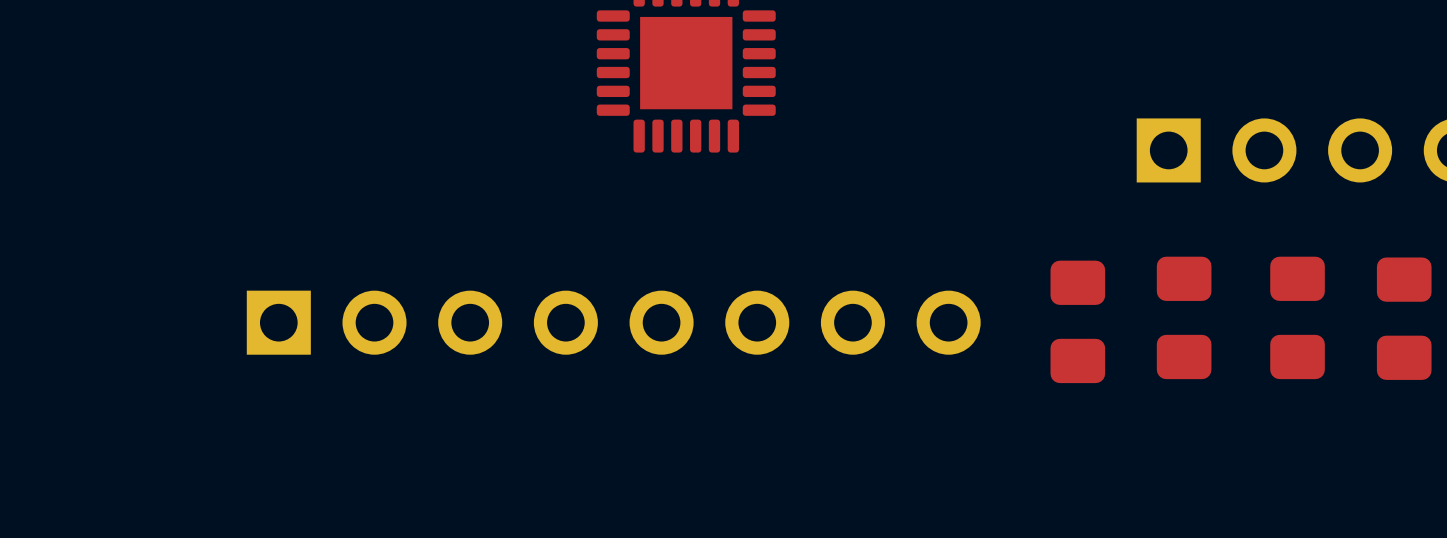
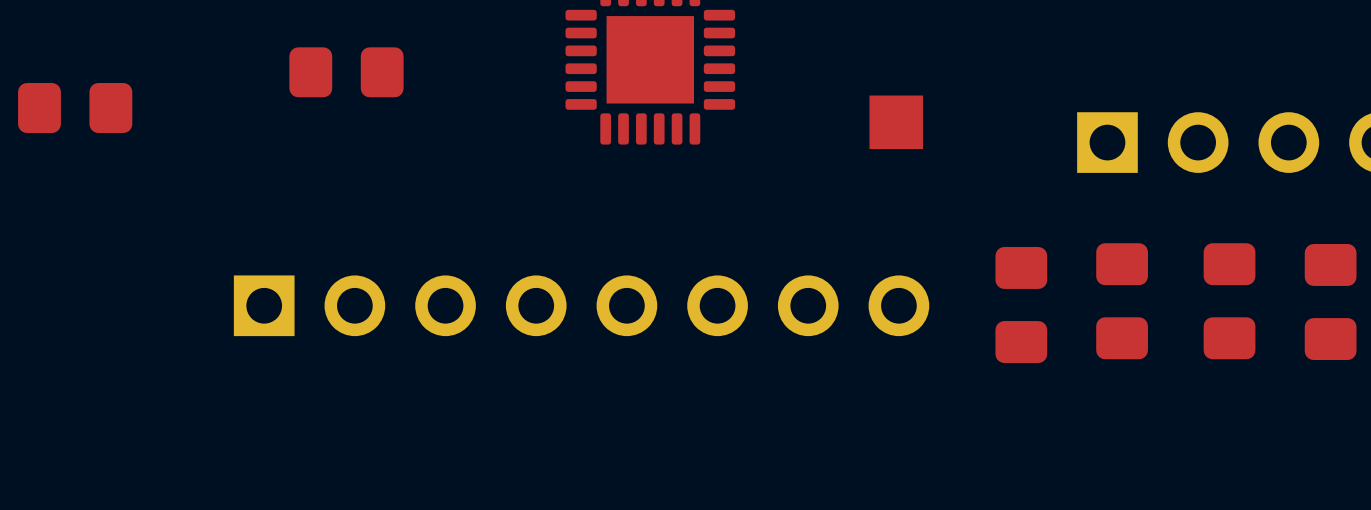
part: none -> (346, 72)
part: none -> (75, 108)
part: none -> (896, 122)

